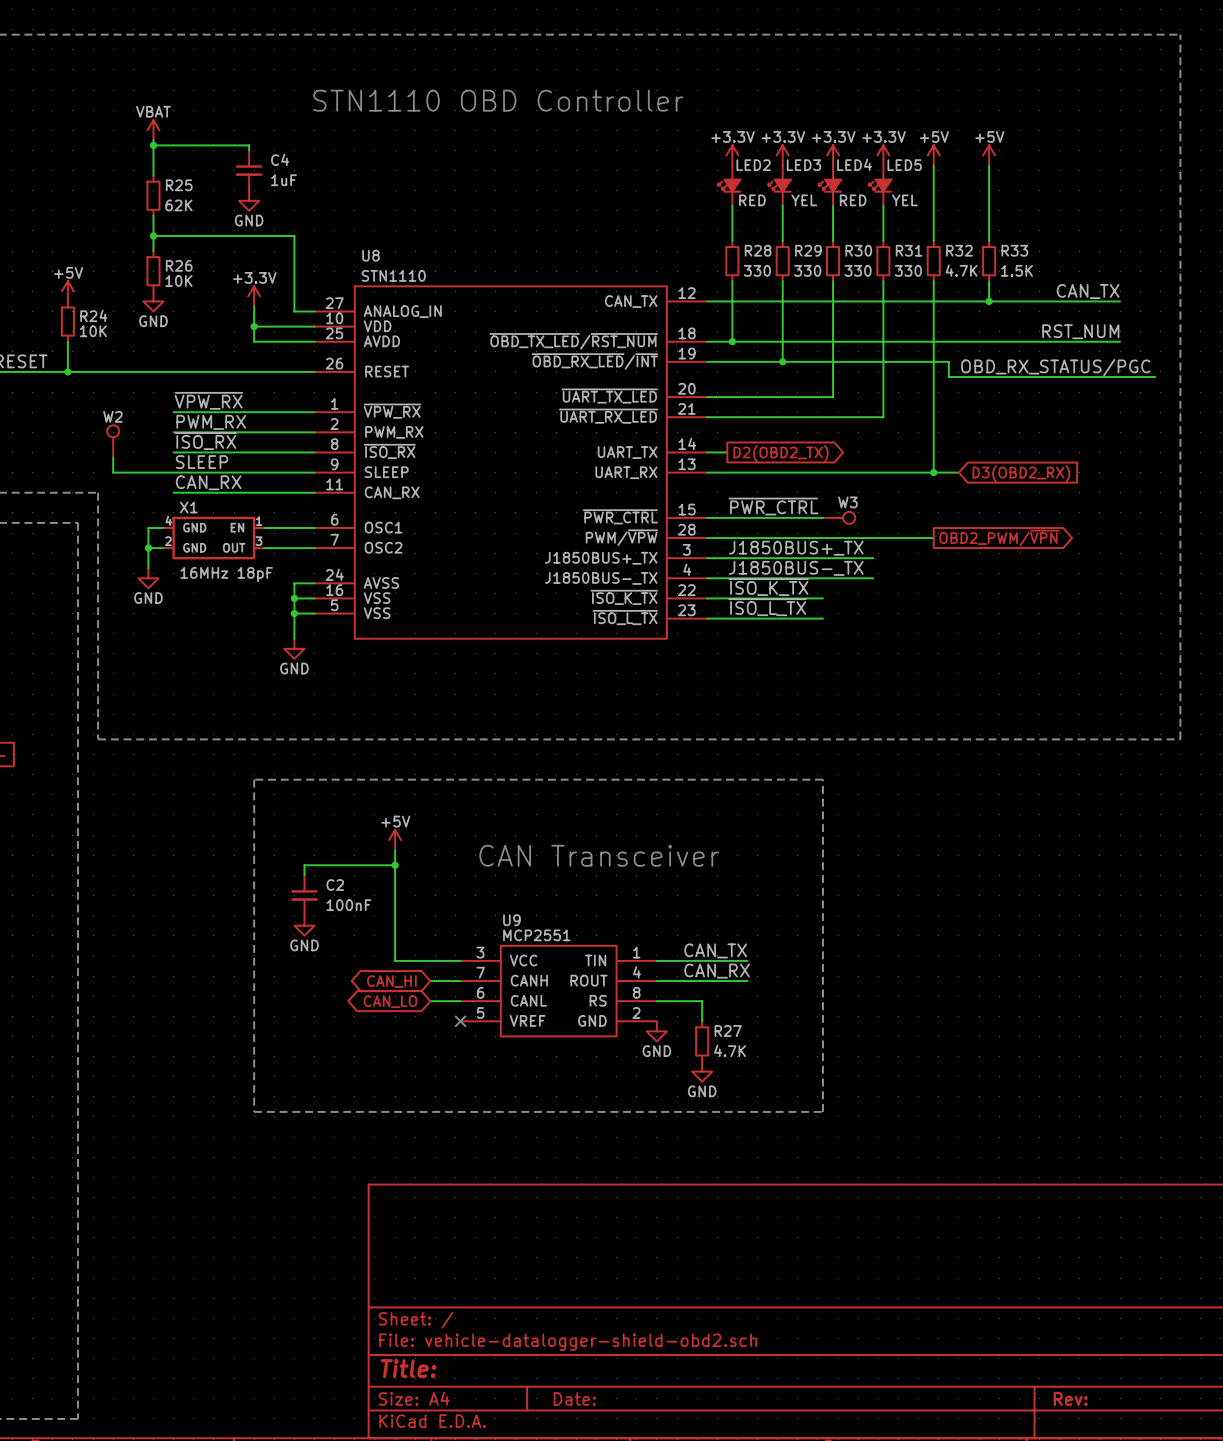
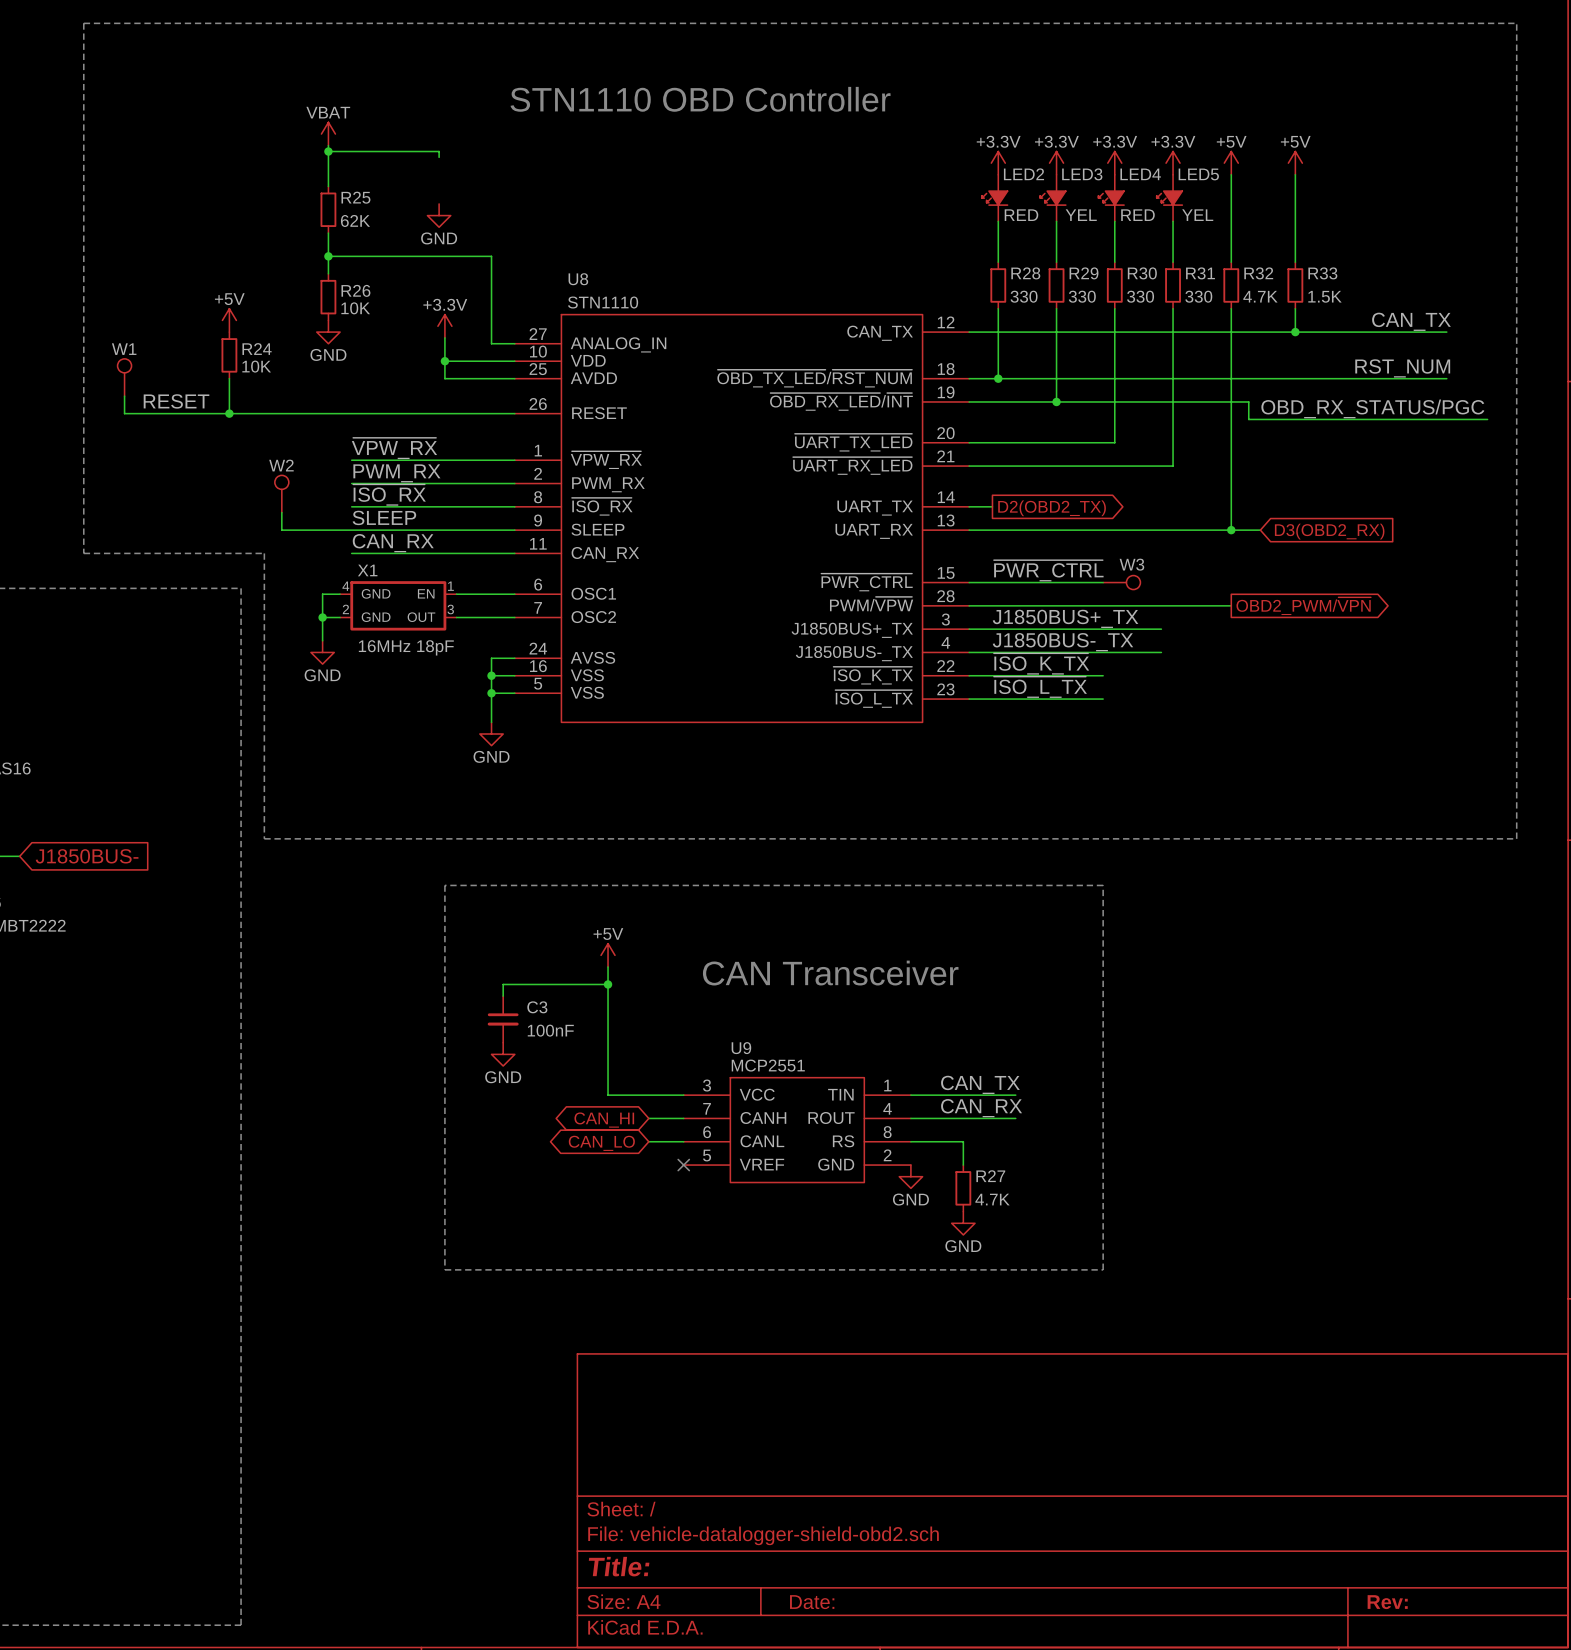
C4: 1uF (249, 170) -> none
C2 name: C2 (335, 885) -> C3 (537, 1007)

